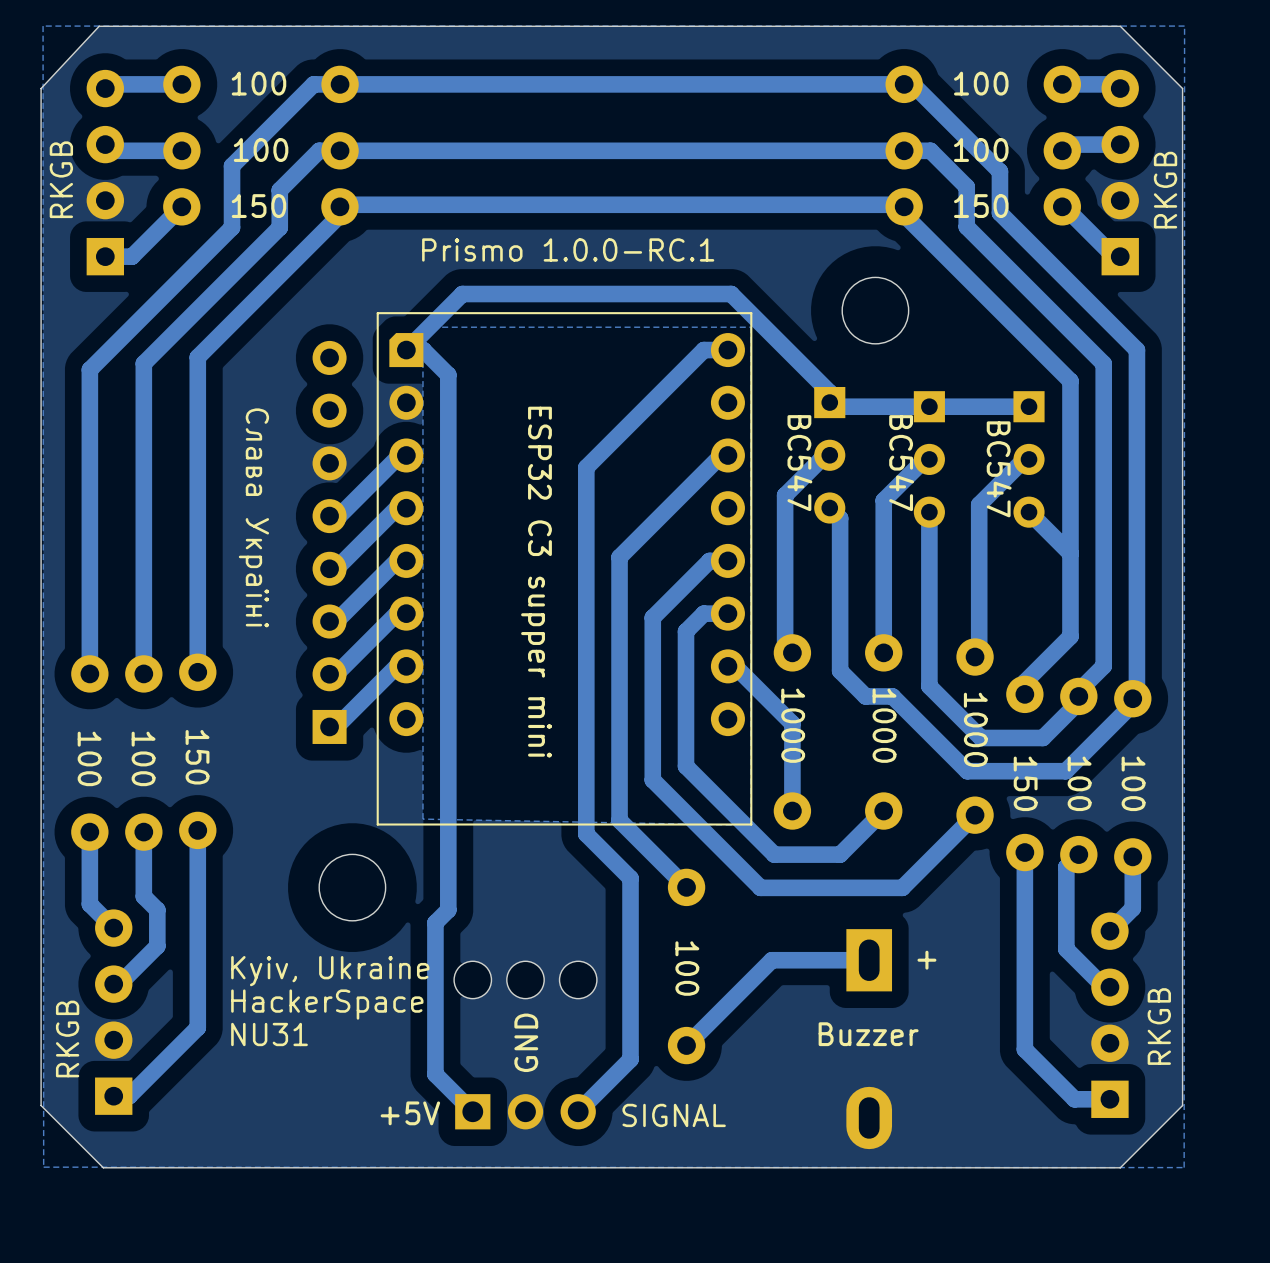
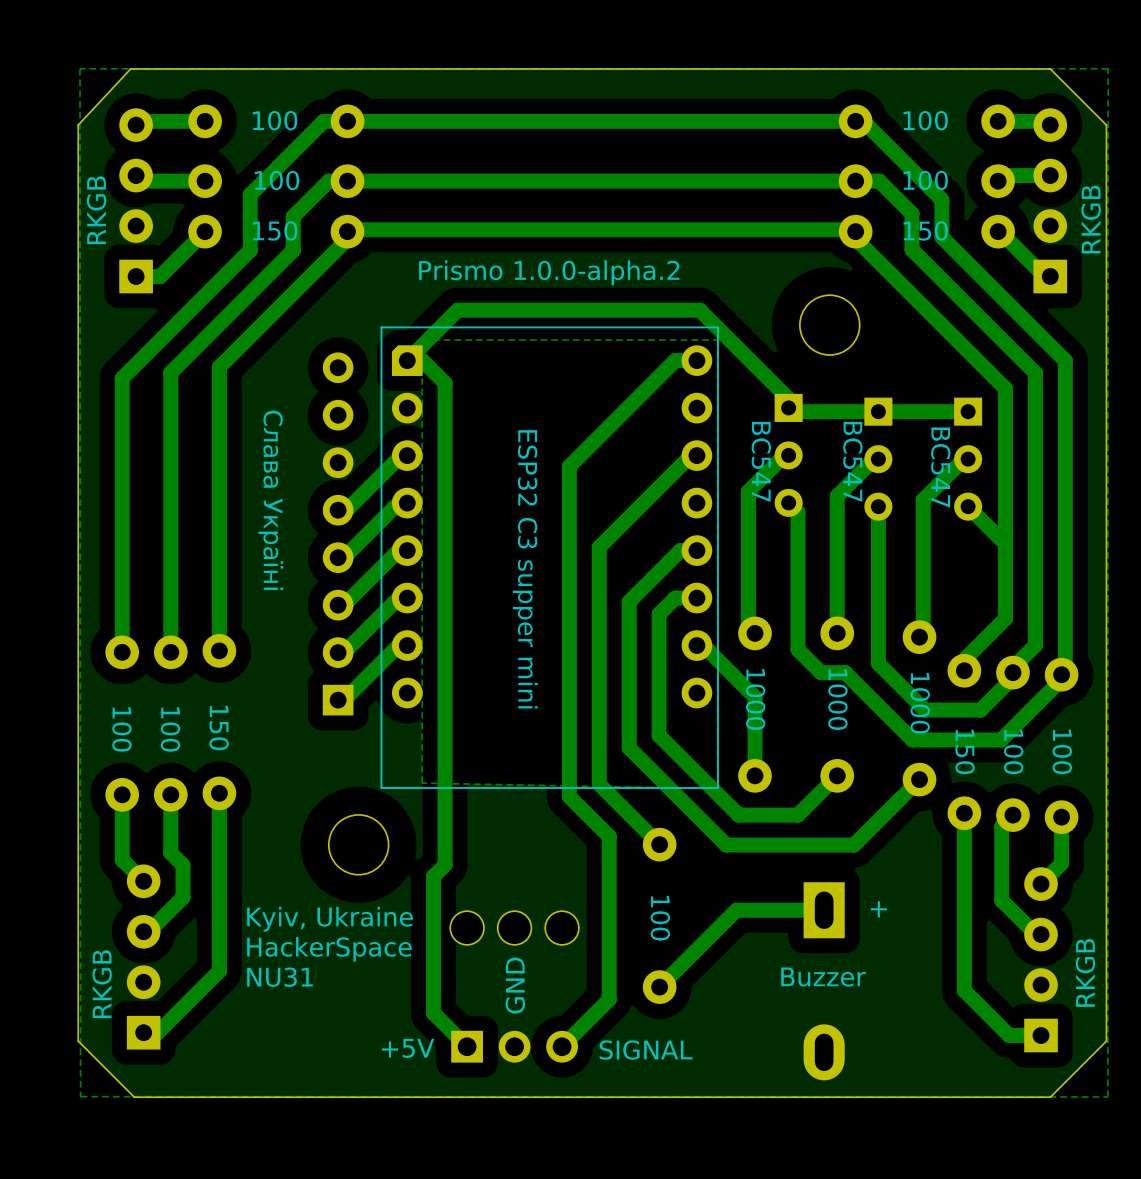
text: Prismo 1.0.0-RC.1 (568, 249) -> Prismo 1.0.0-alpha.2 (549, 272)

